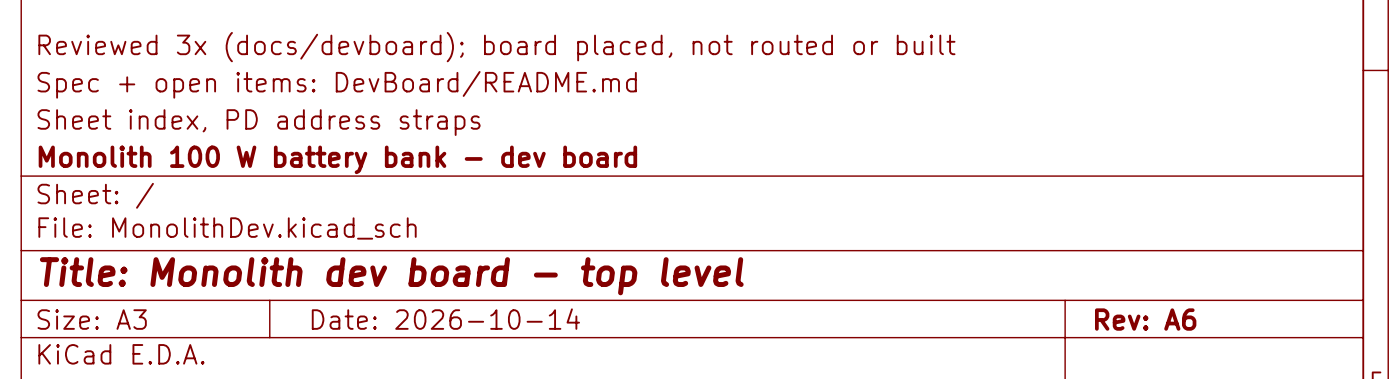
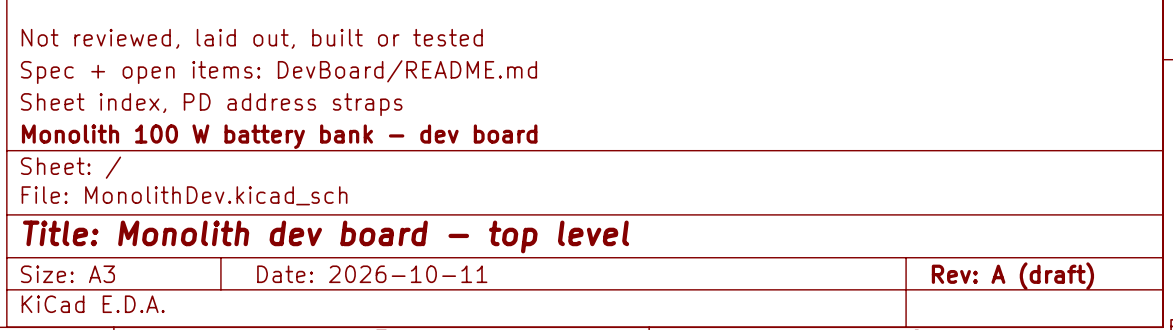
title block: Reviewed 3x (docs/devboard); board placed, not routed or built (496, 47) -> Not reviewed, laid out, built or tested (252, 38)
title block: Date: 2026-10-14 (445, 319) -> Date: 2026-10-11 (372, 274)
title block: Rev: A6 (1145, 319) -> Rev: A (draft) (1012, 276)

